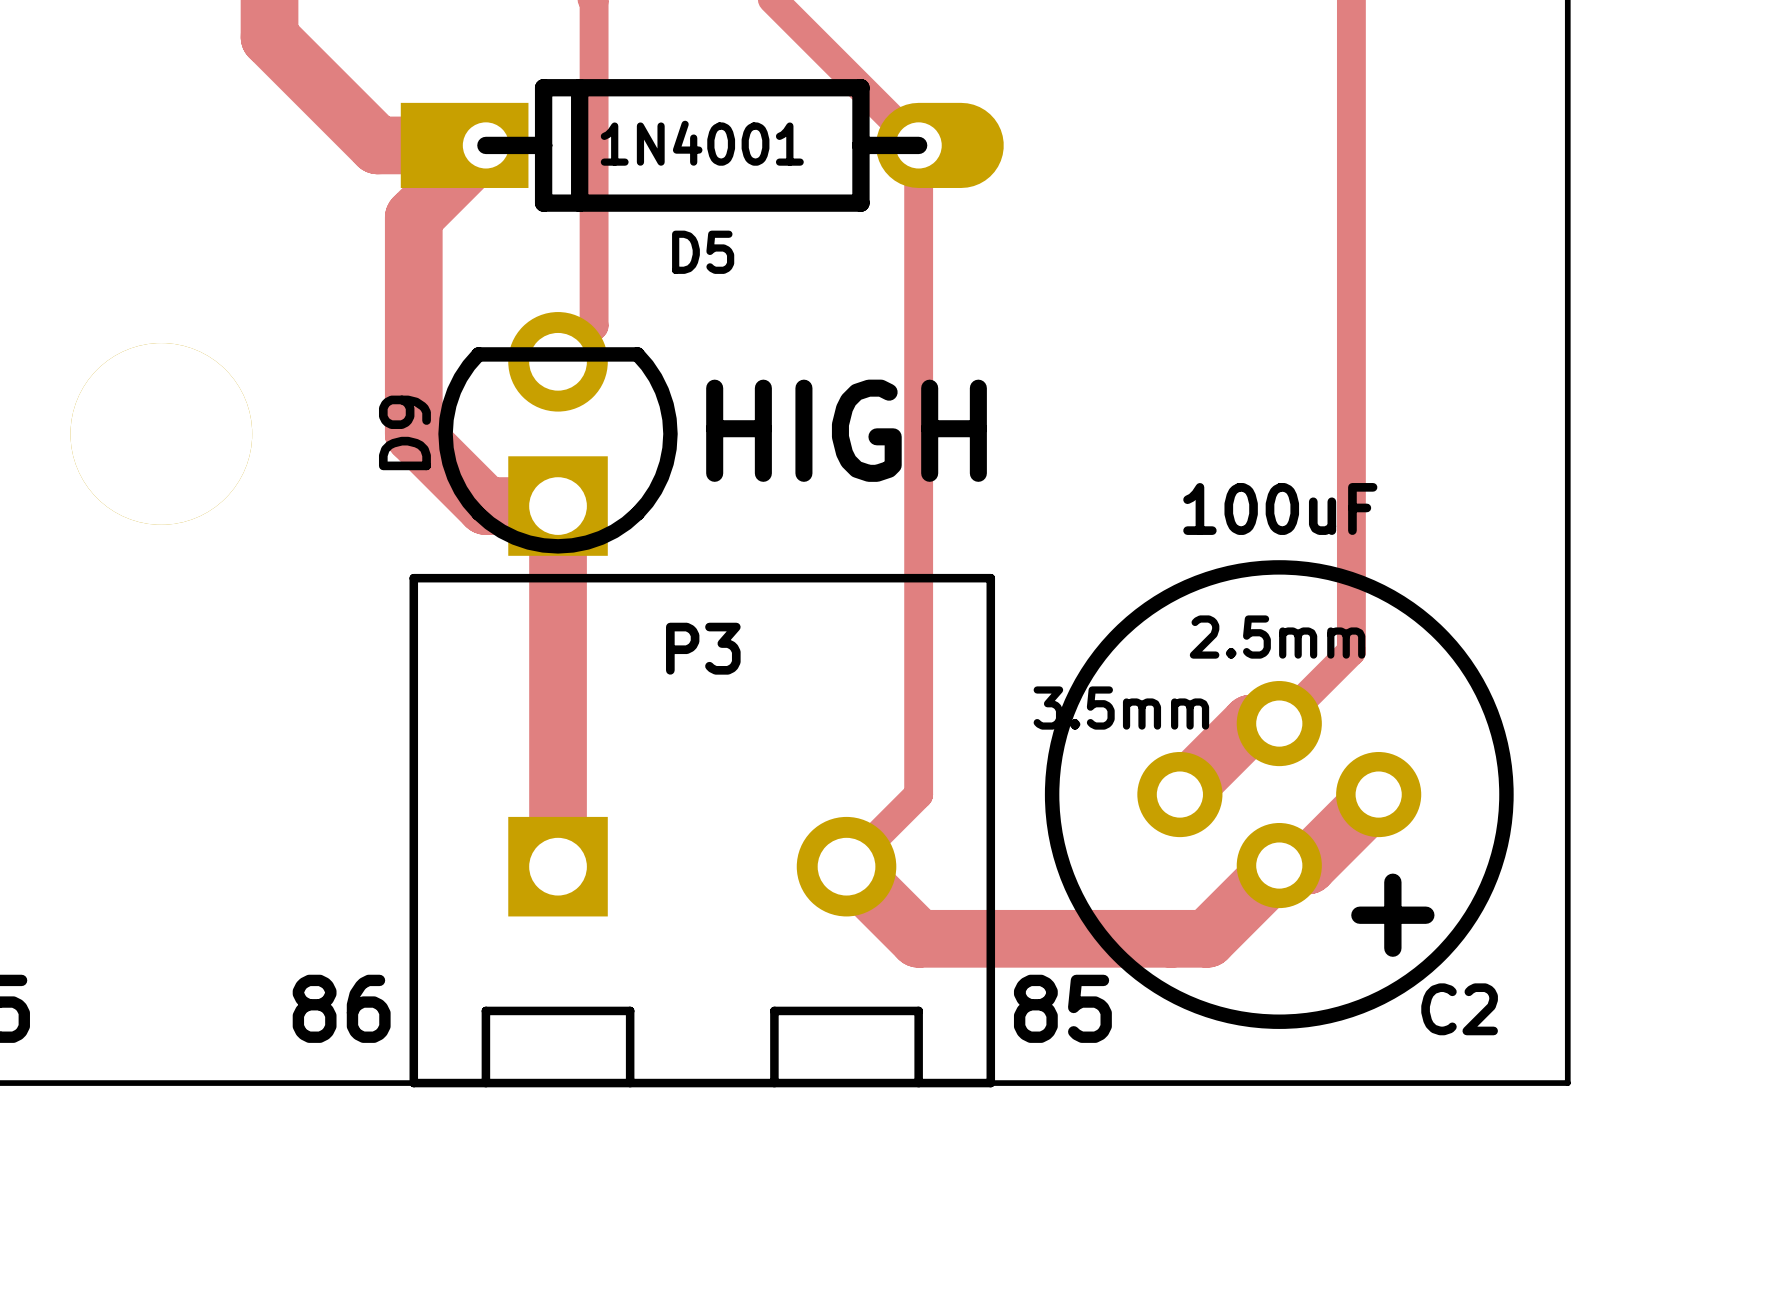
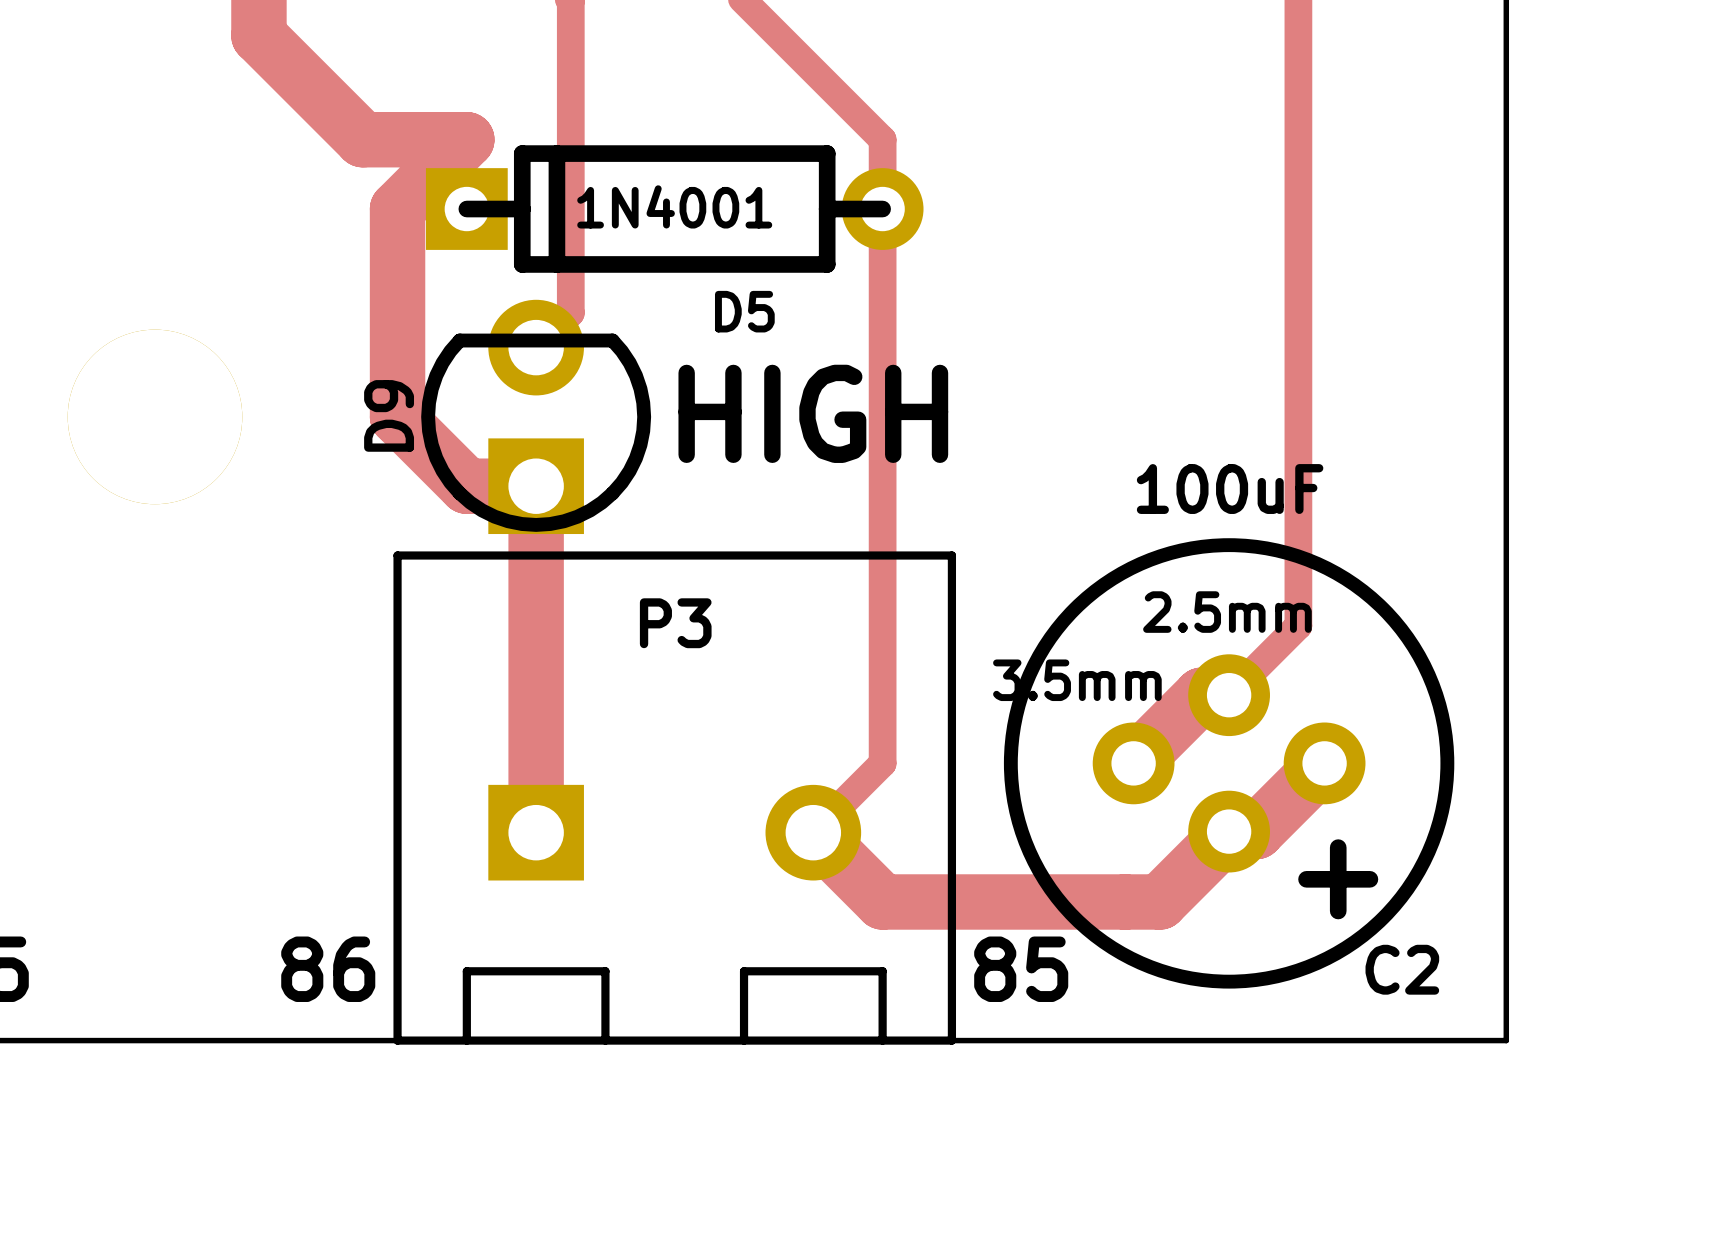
D5 footprint: [400, 79, 1004, 212] -> [425, 145, 924, 273]

